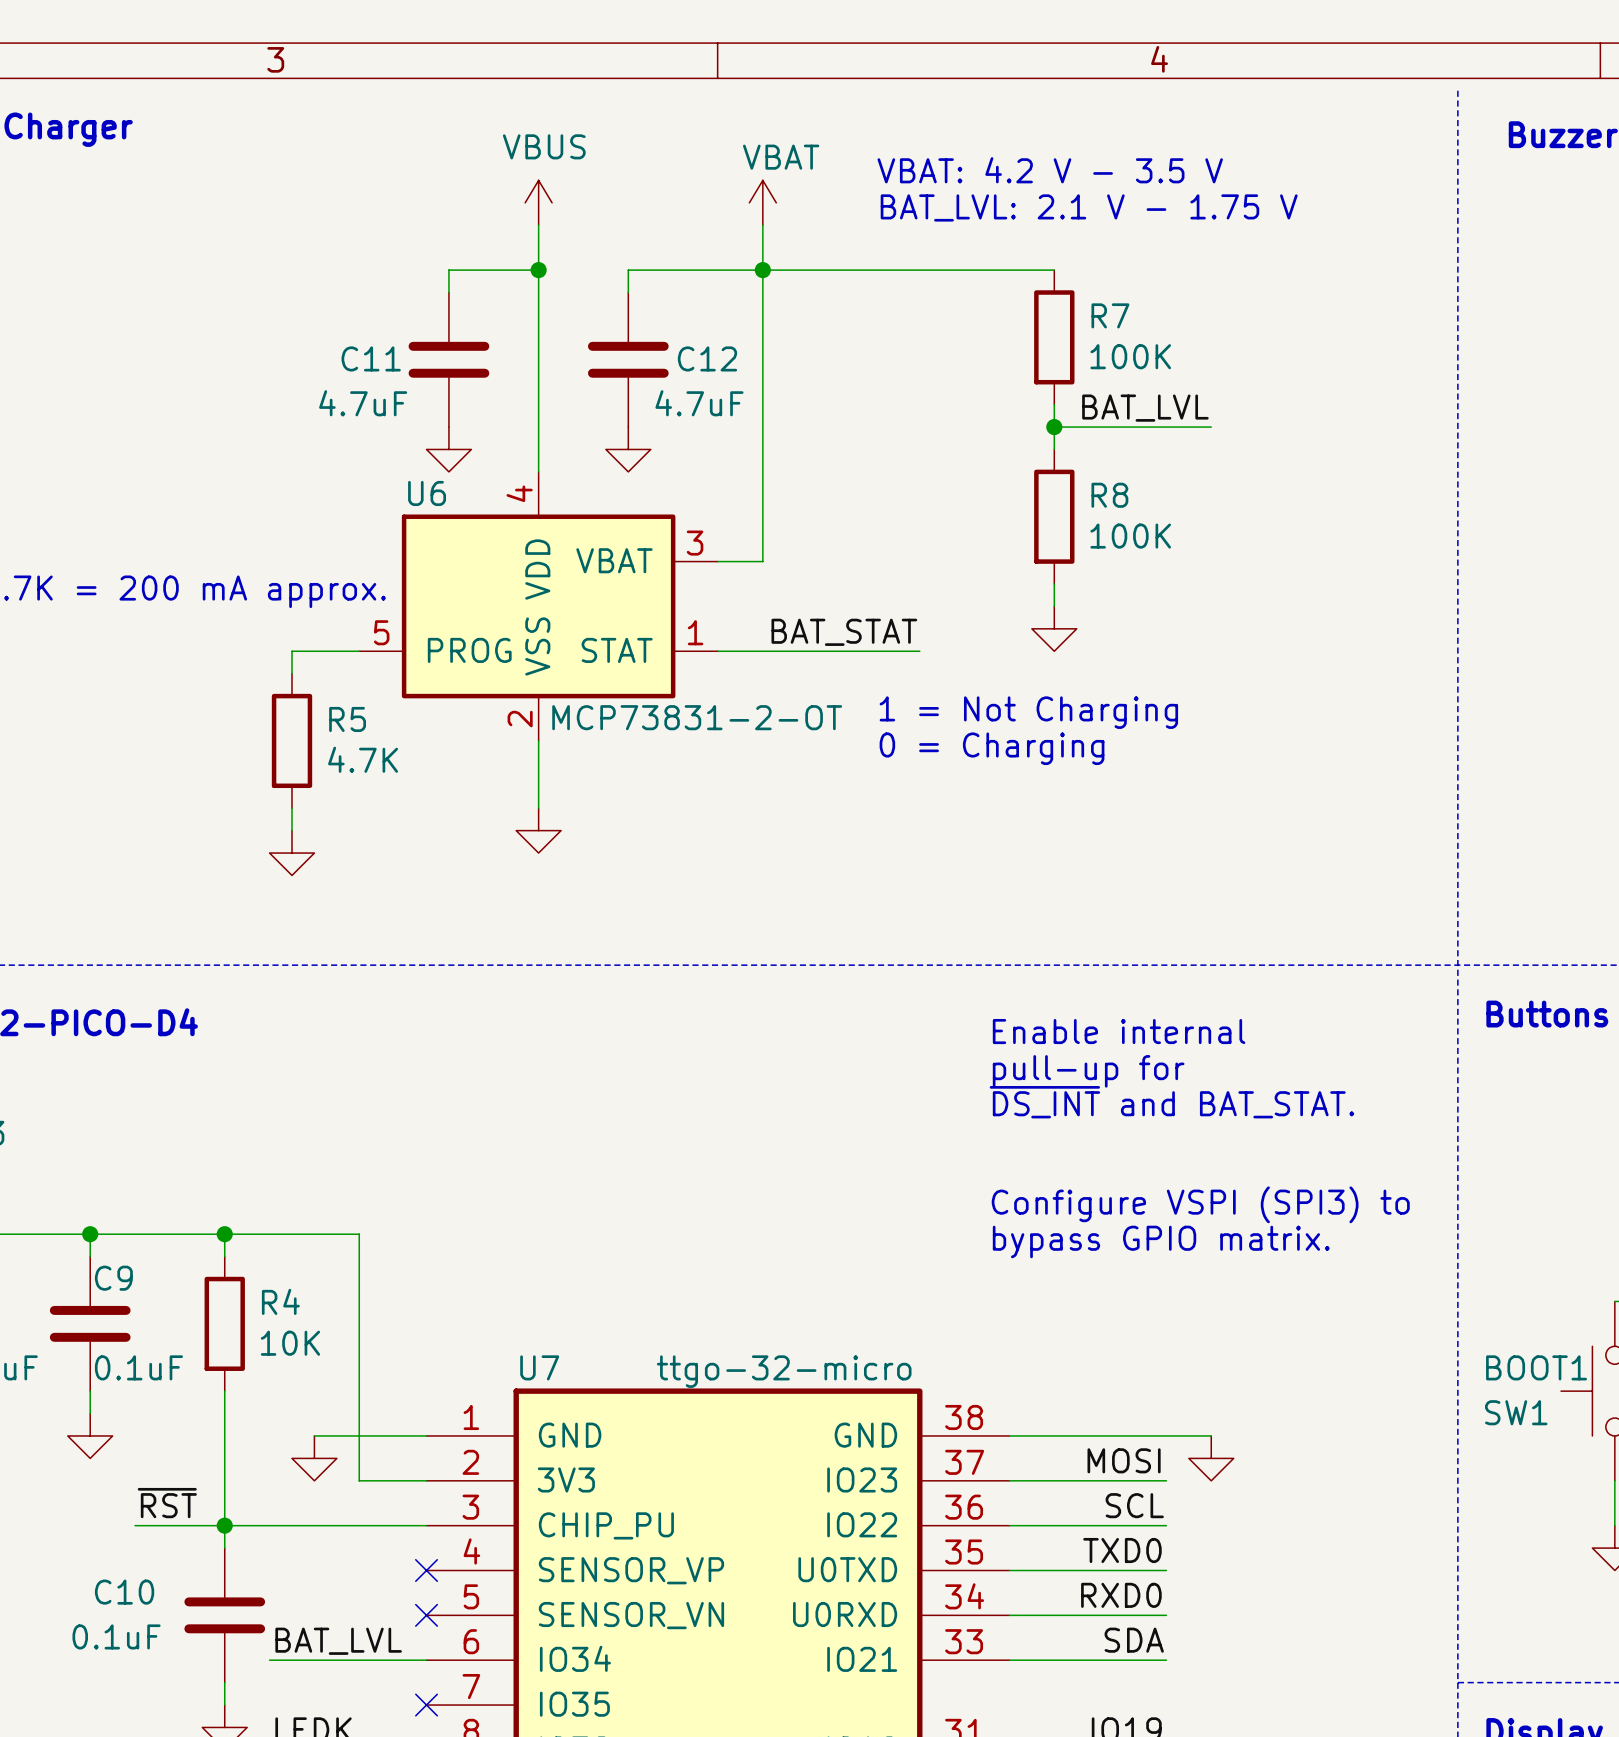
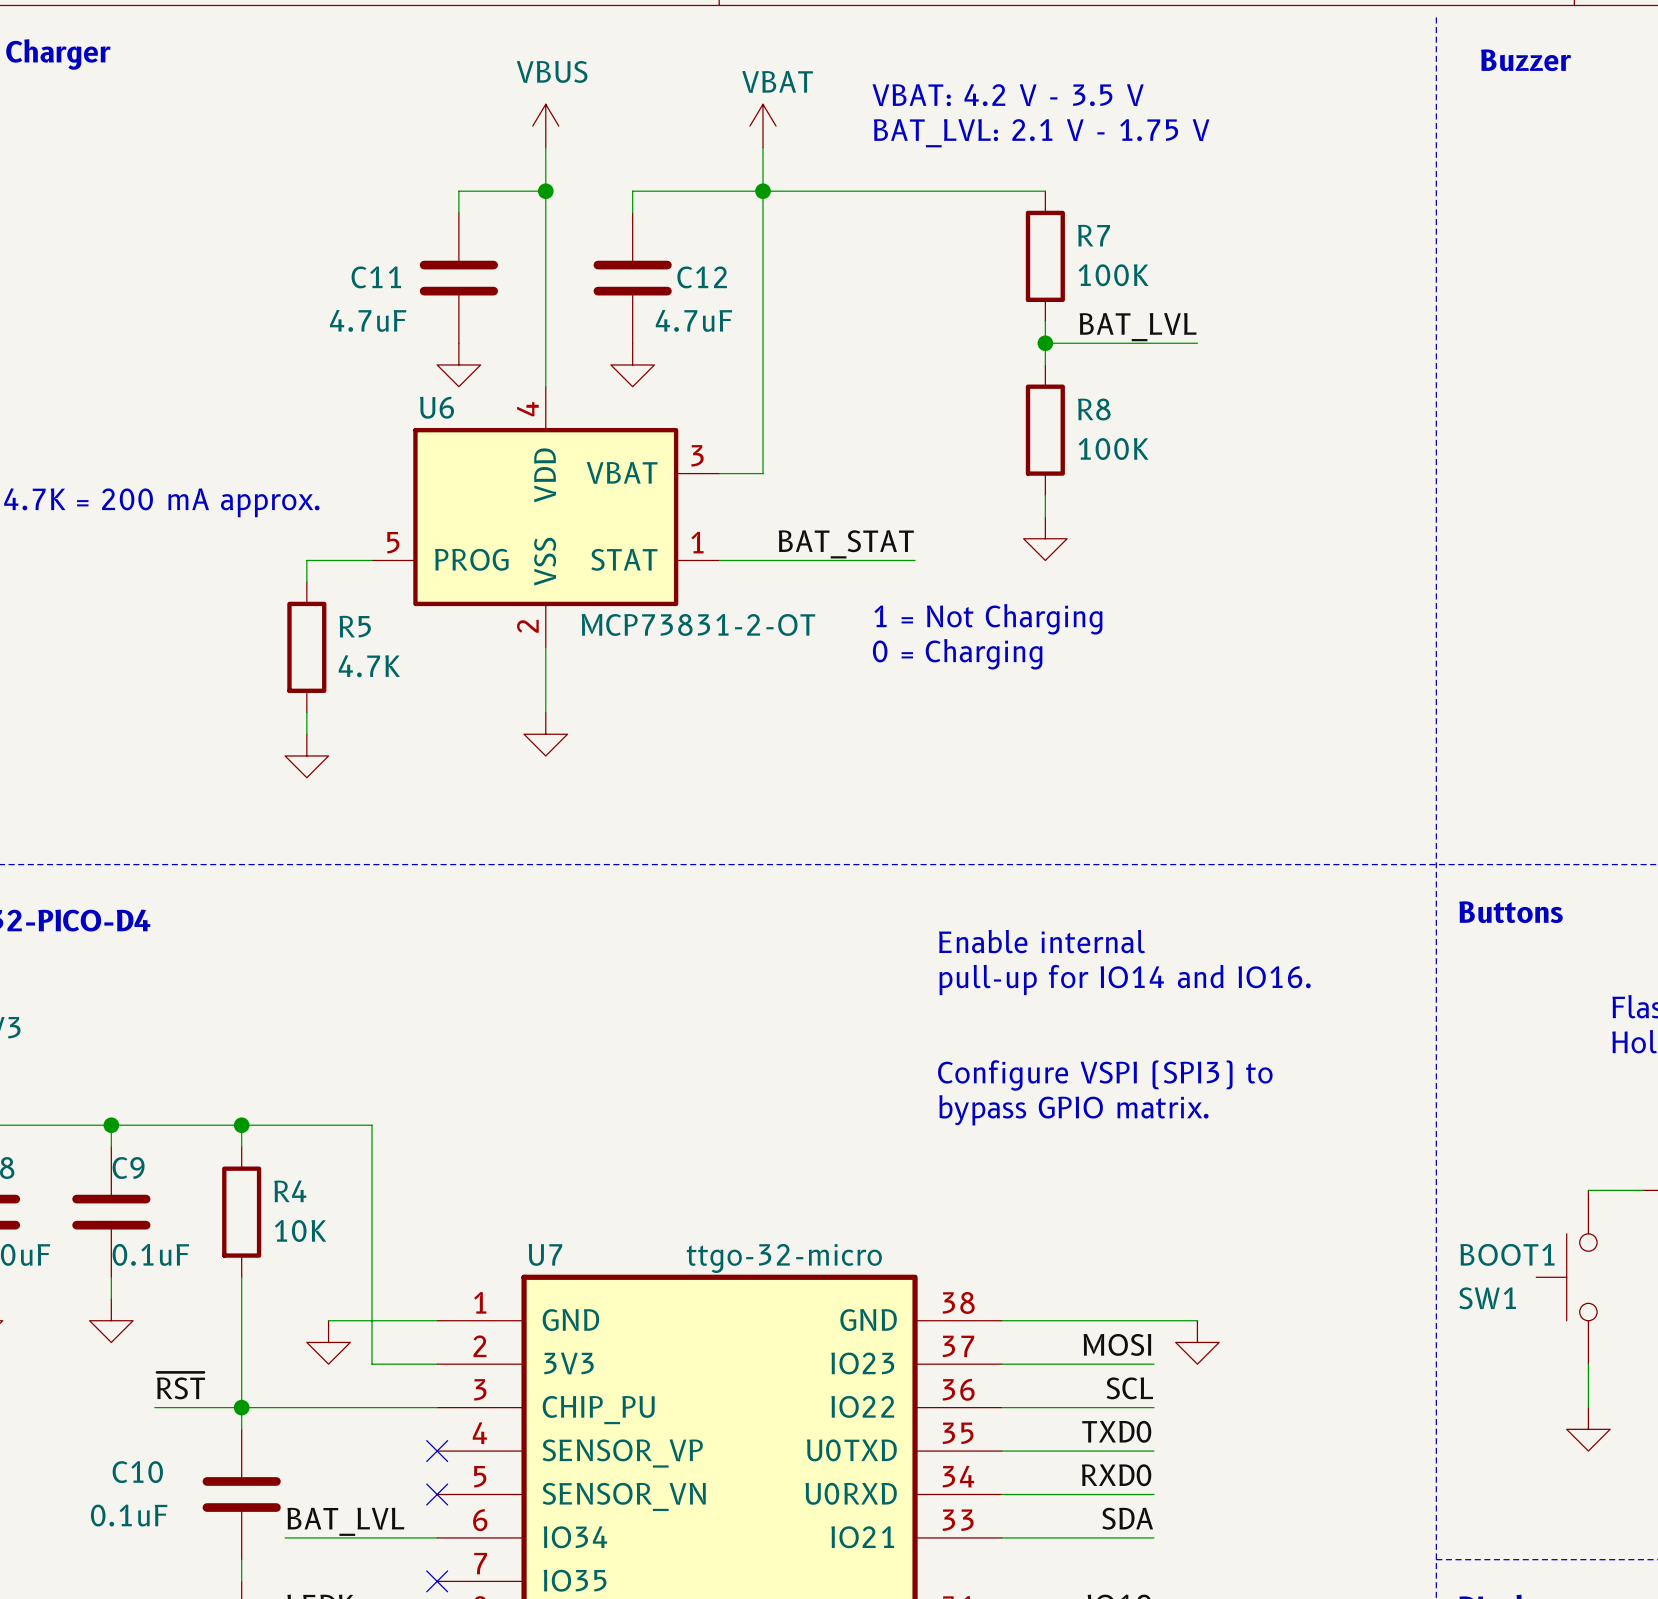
text position: Enable internal (1119, 1031) -> Enable internal (1042, 941)
text: pull-up for (1088, 1071) -> none
text: none -> pull-up for IO14 and IO16. (1125, 979)
text: ~{DS_INT} and BAT_STAT. (1171, 1102) -> none
text position: Configure VSPI (SPI3) to (1200, 1204) -> Configure VSPI (SPI3) to (1105, 1075)
text position: bypass GPIO matrix. (1161, 1241) -> bypass GPIO matrix. (1073, 1110)

